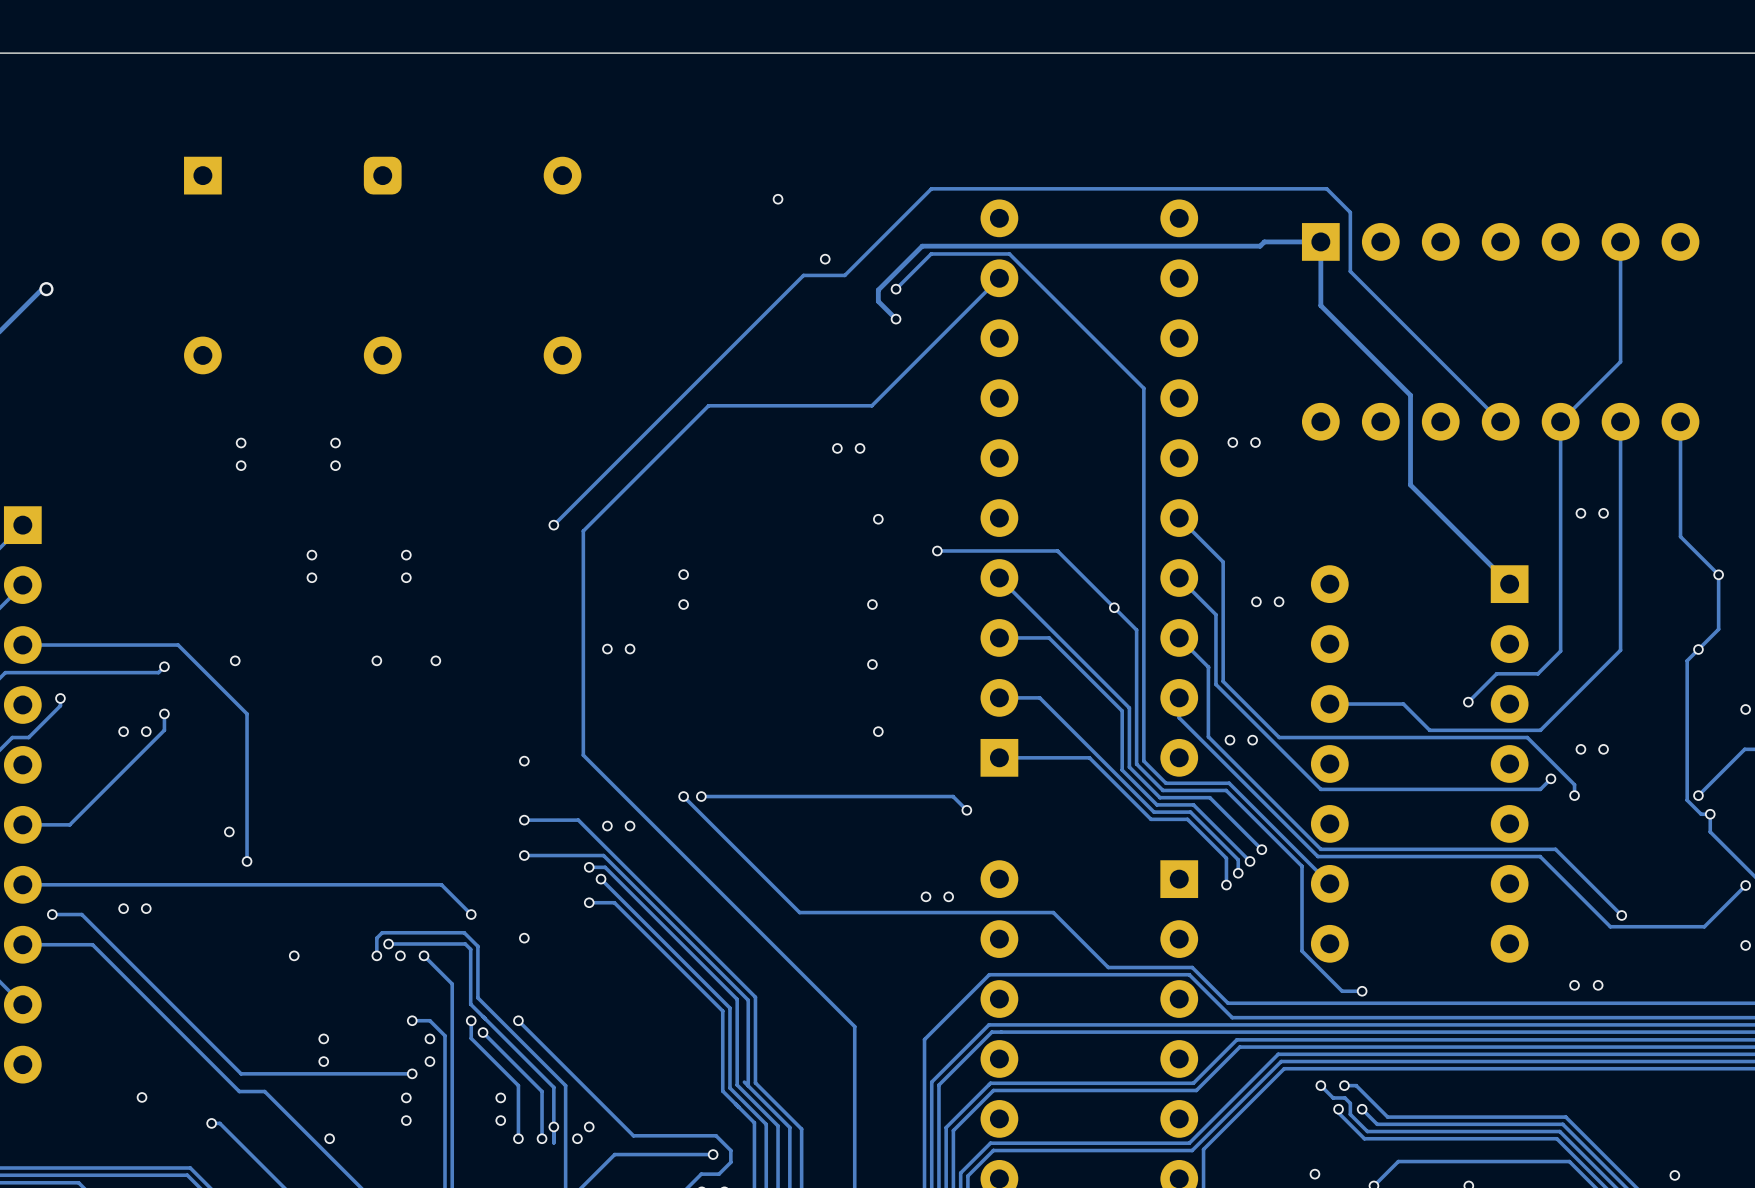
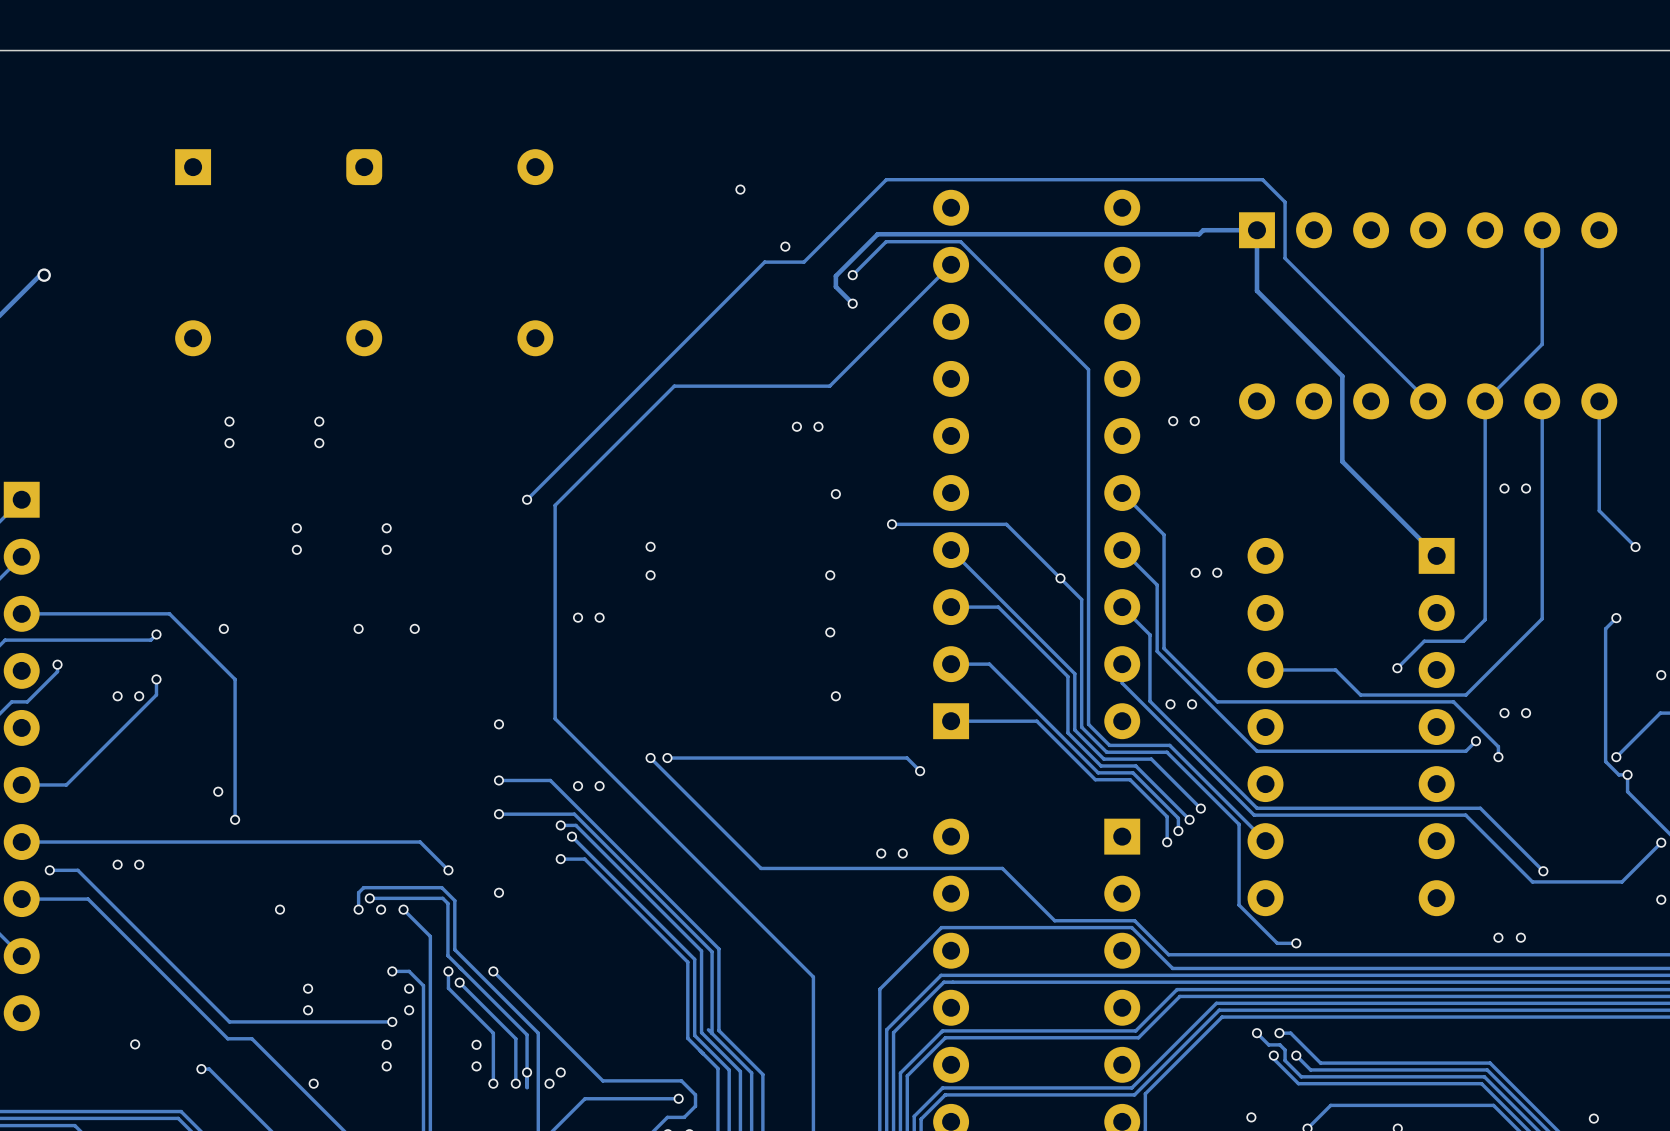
track: (1718, 574) (1718, 629) (1698, 649) -> none

